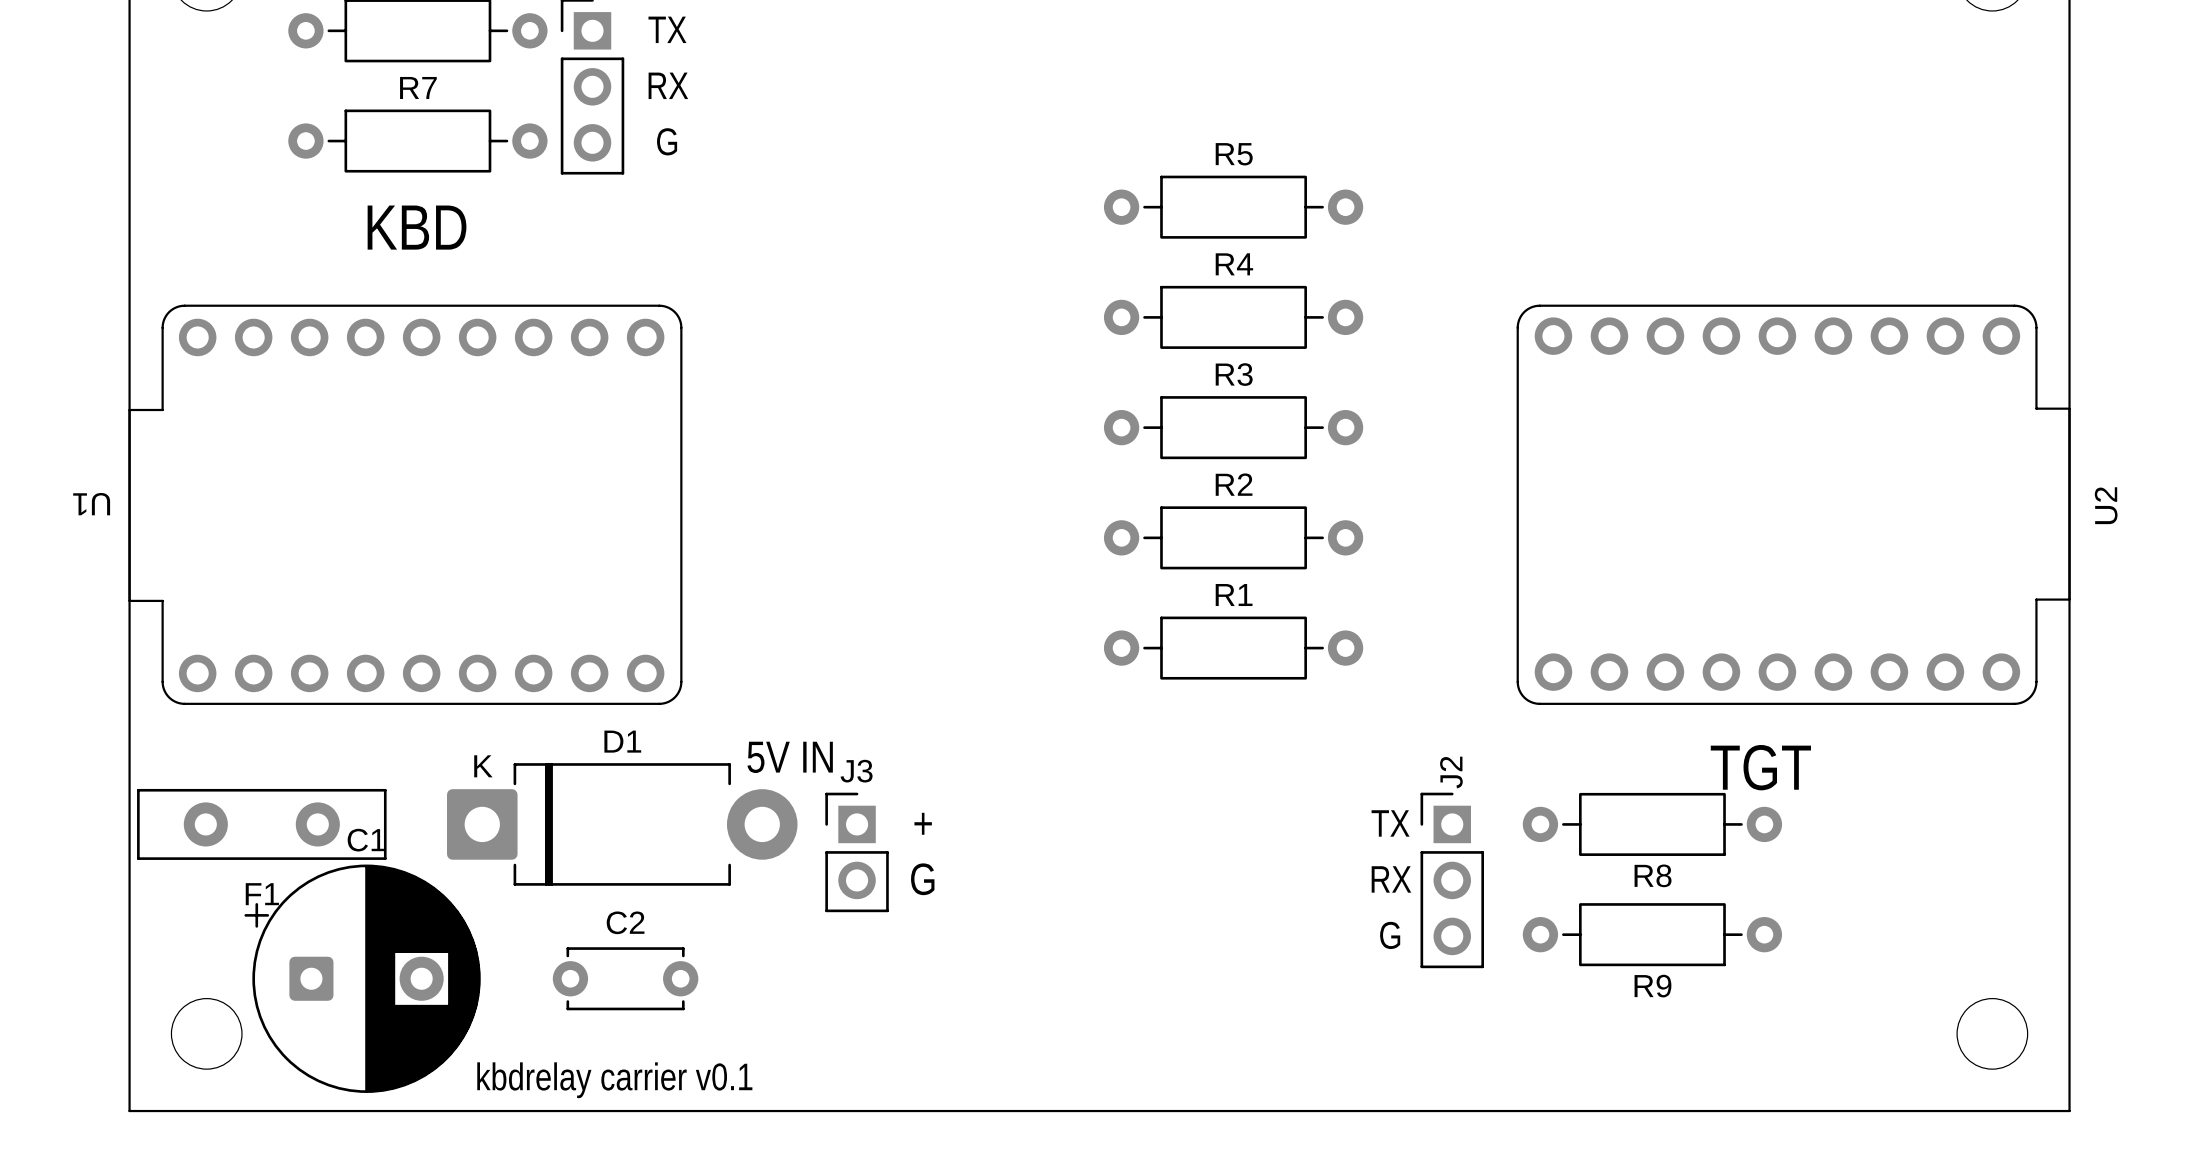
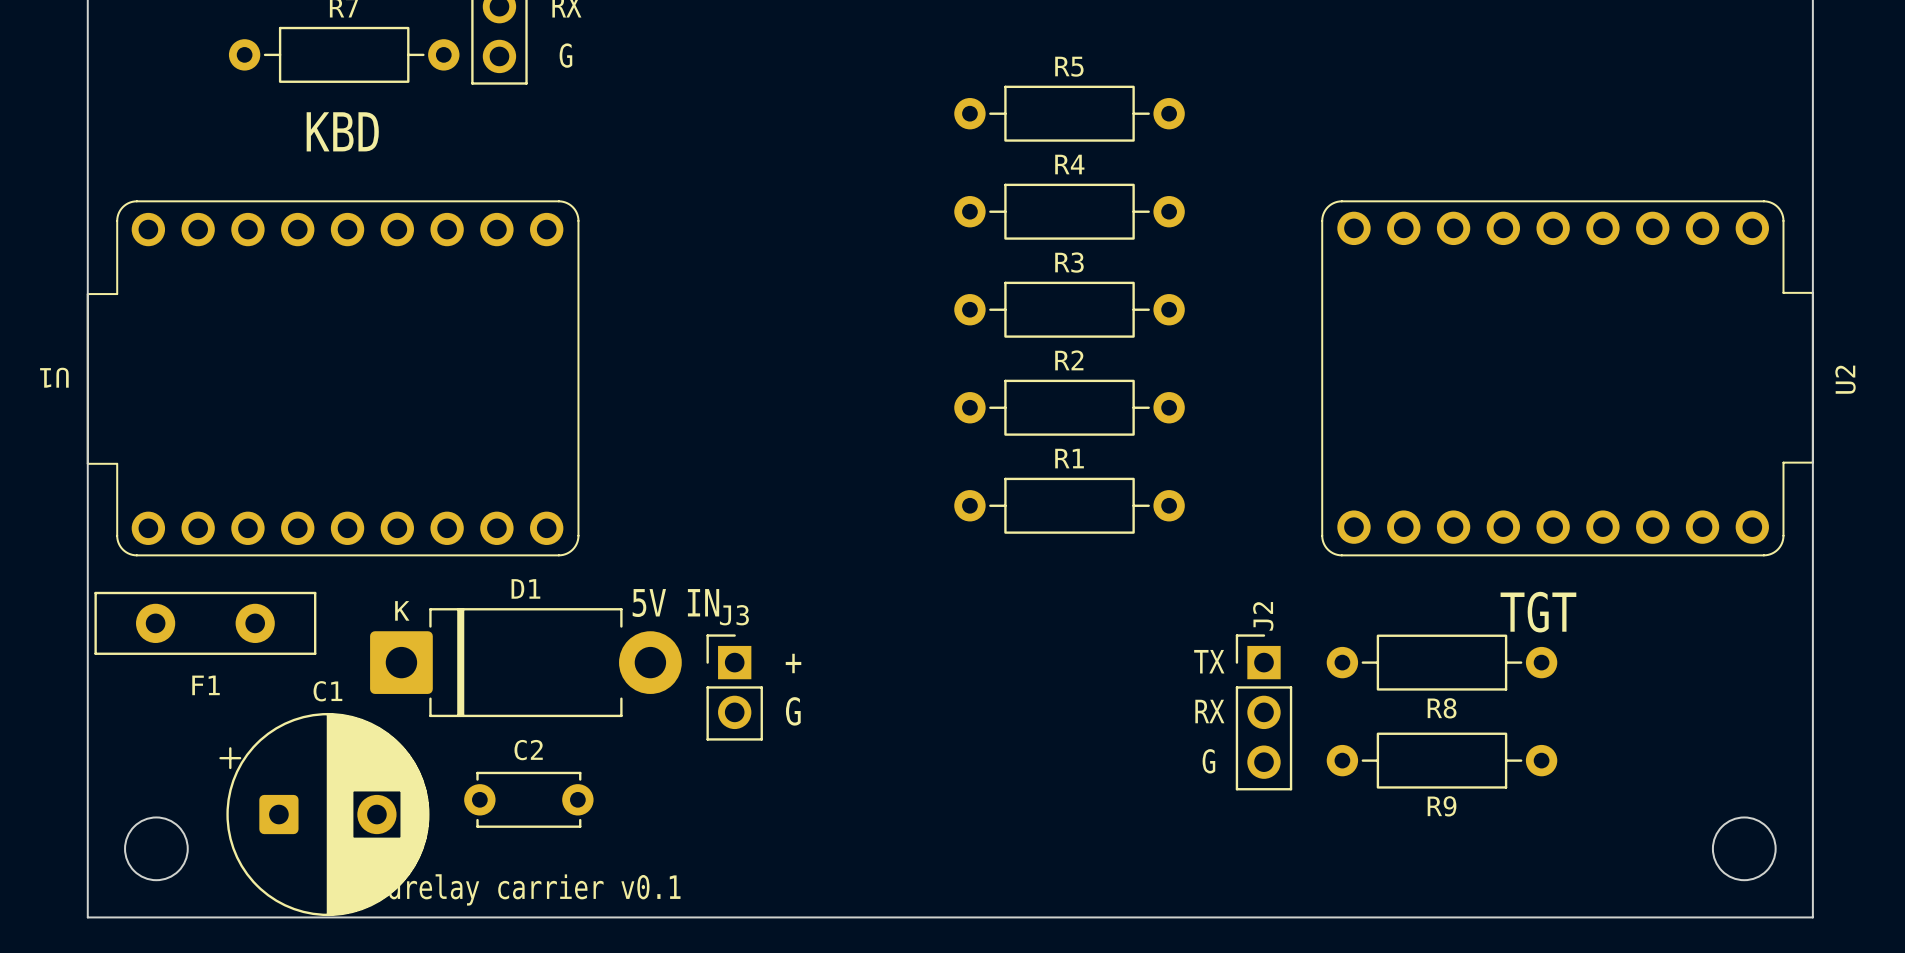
F1 position: (261, 824) -> (205, 623)
C1 position: (362, 978) -> (324, 814)

